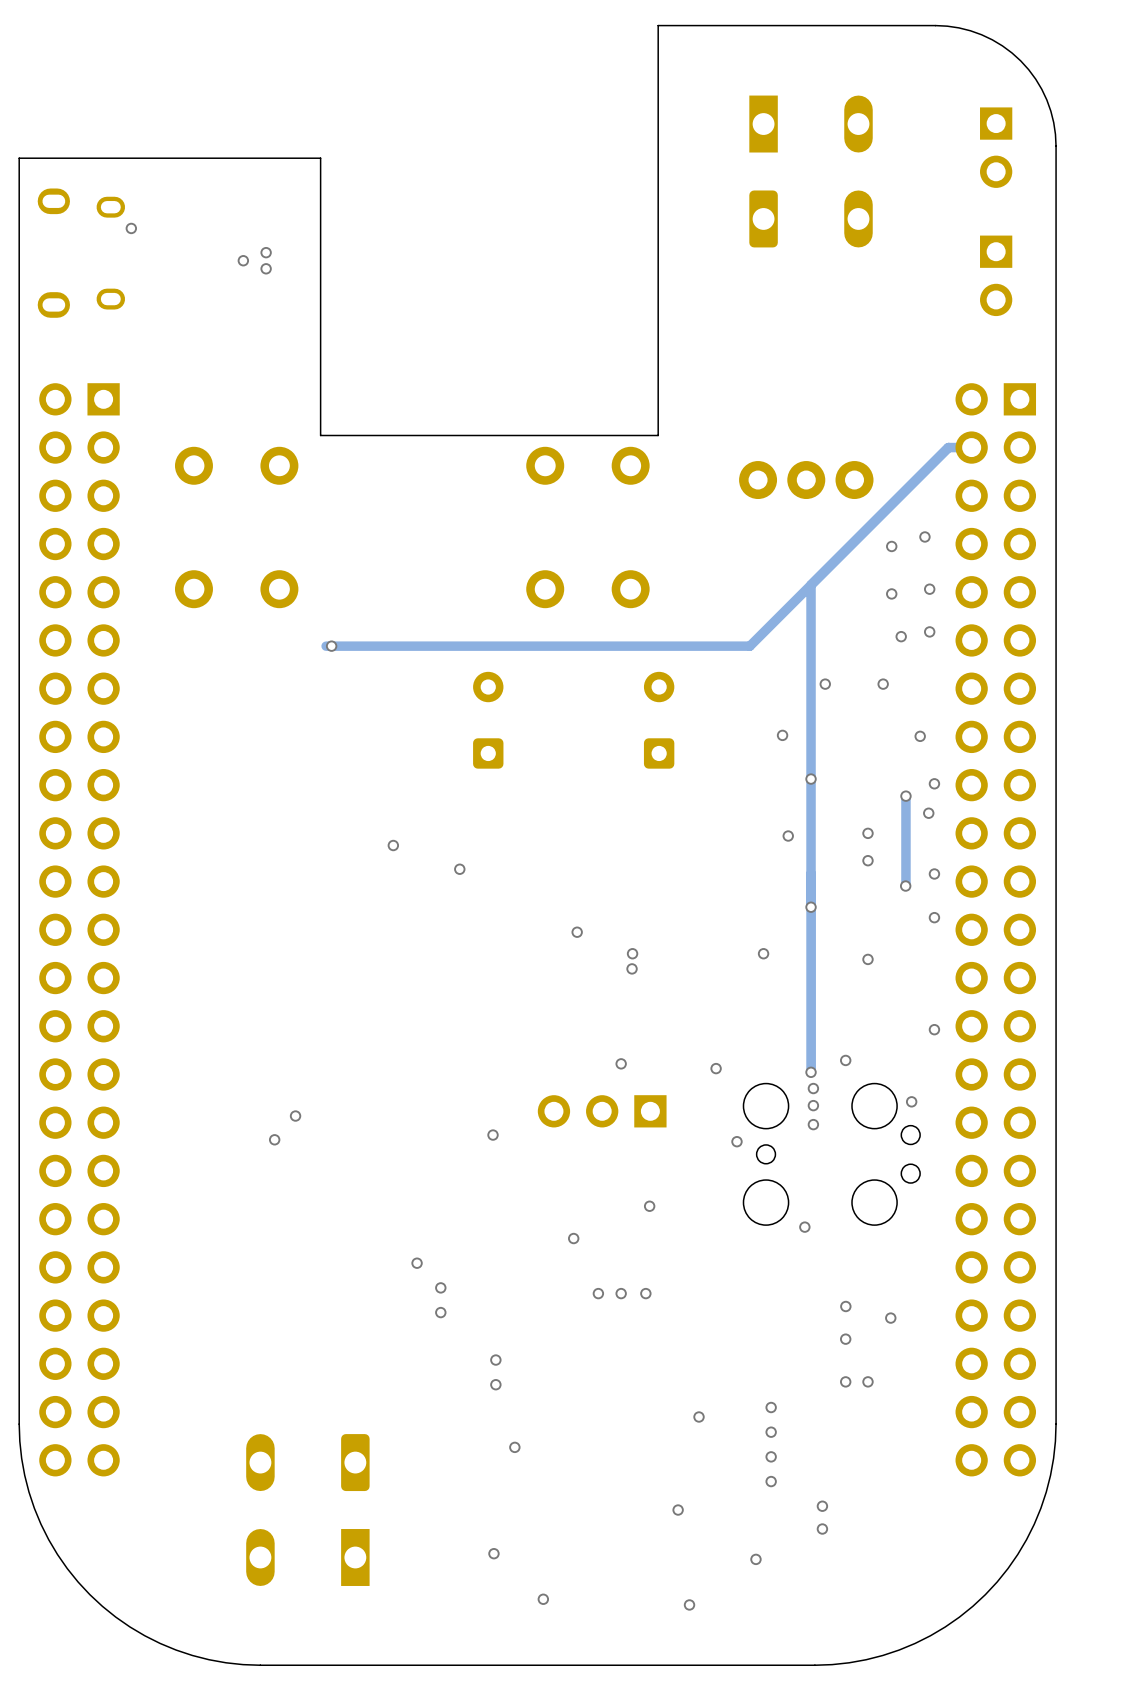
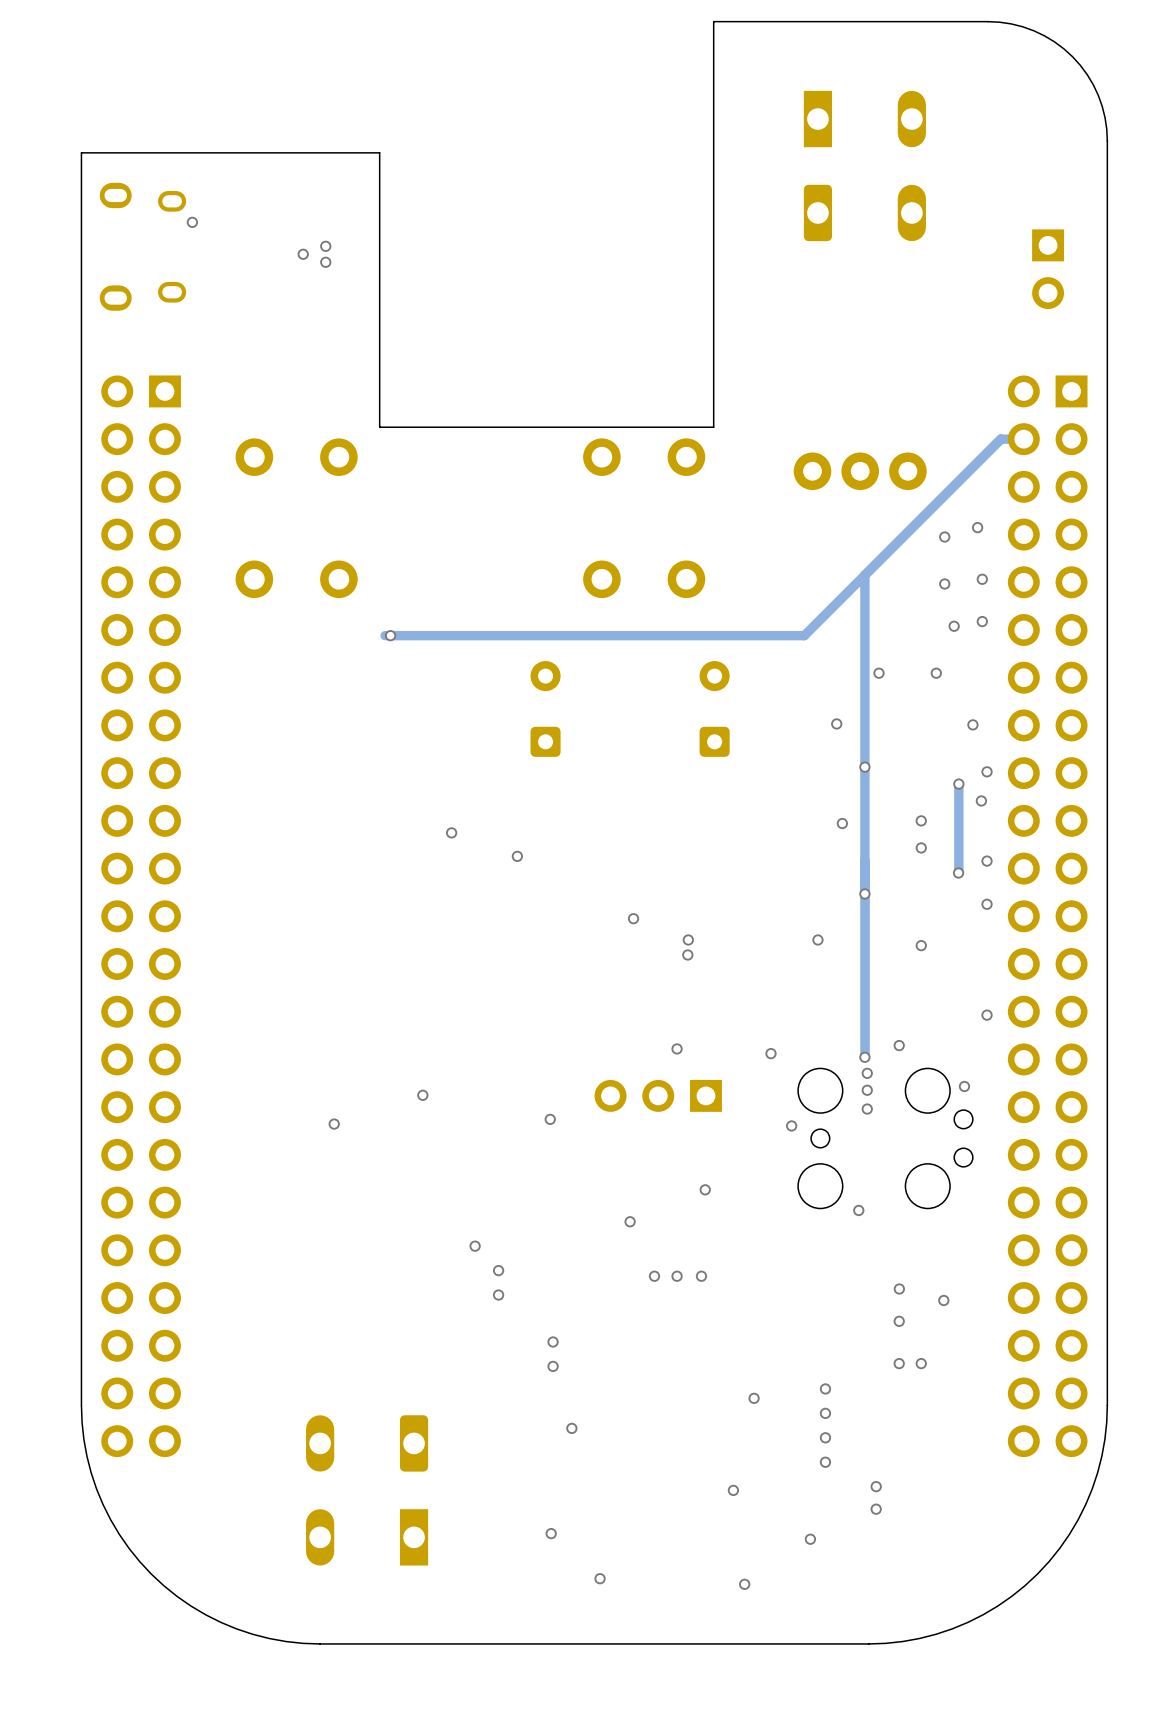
part: (996, 147) -> none
via position: (295, 1116) -> (422, 1095)

